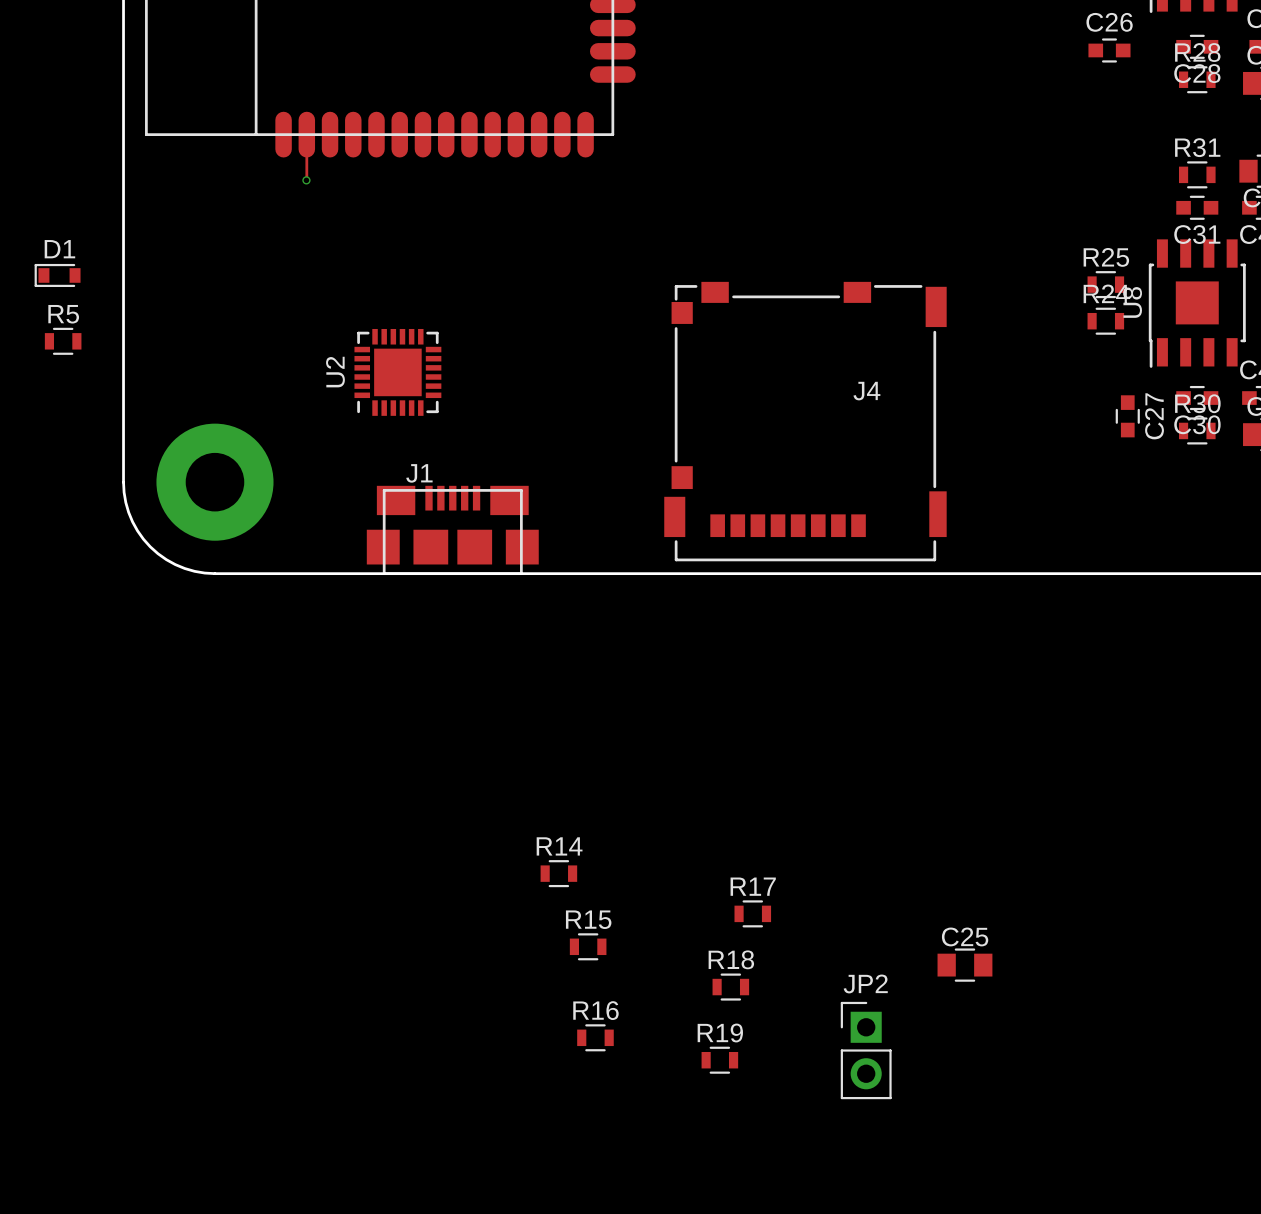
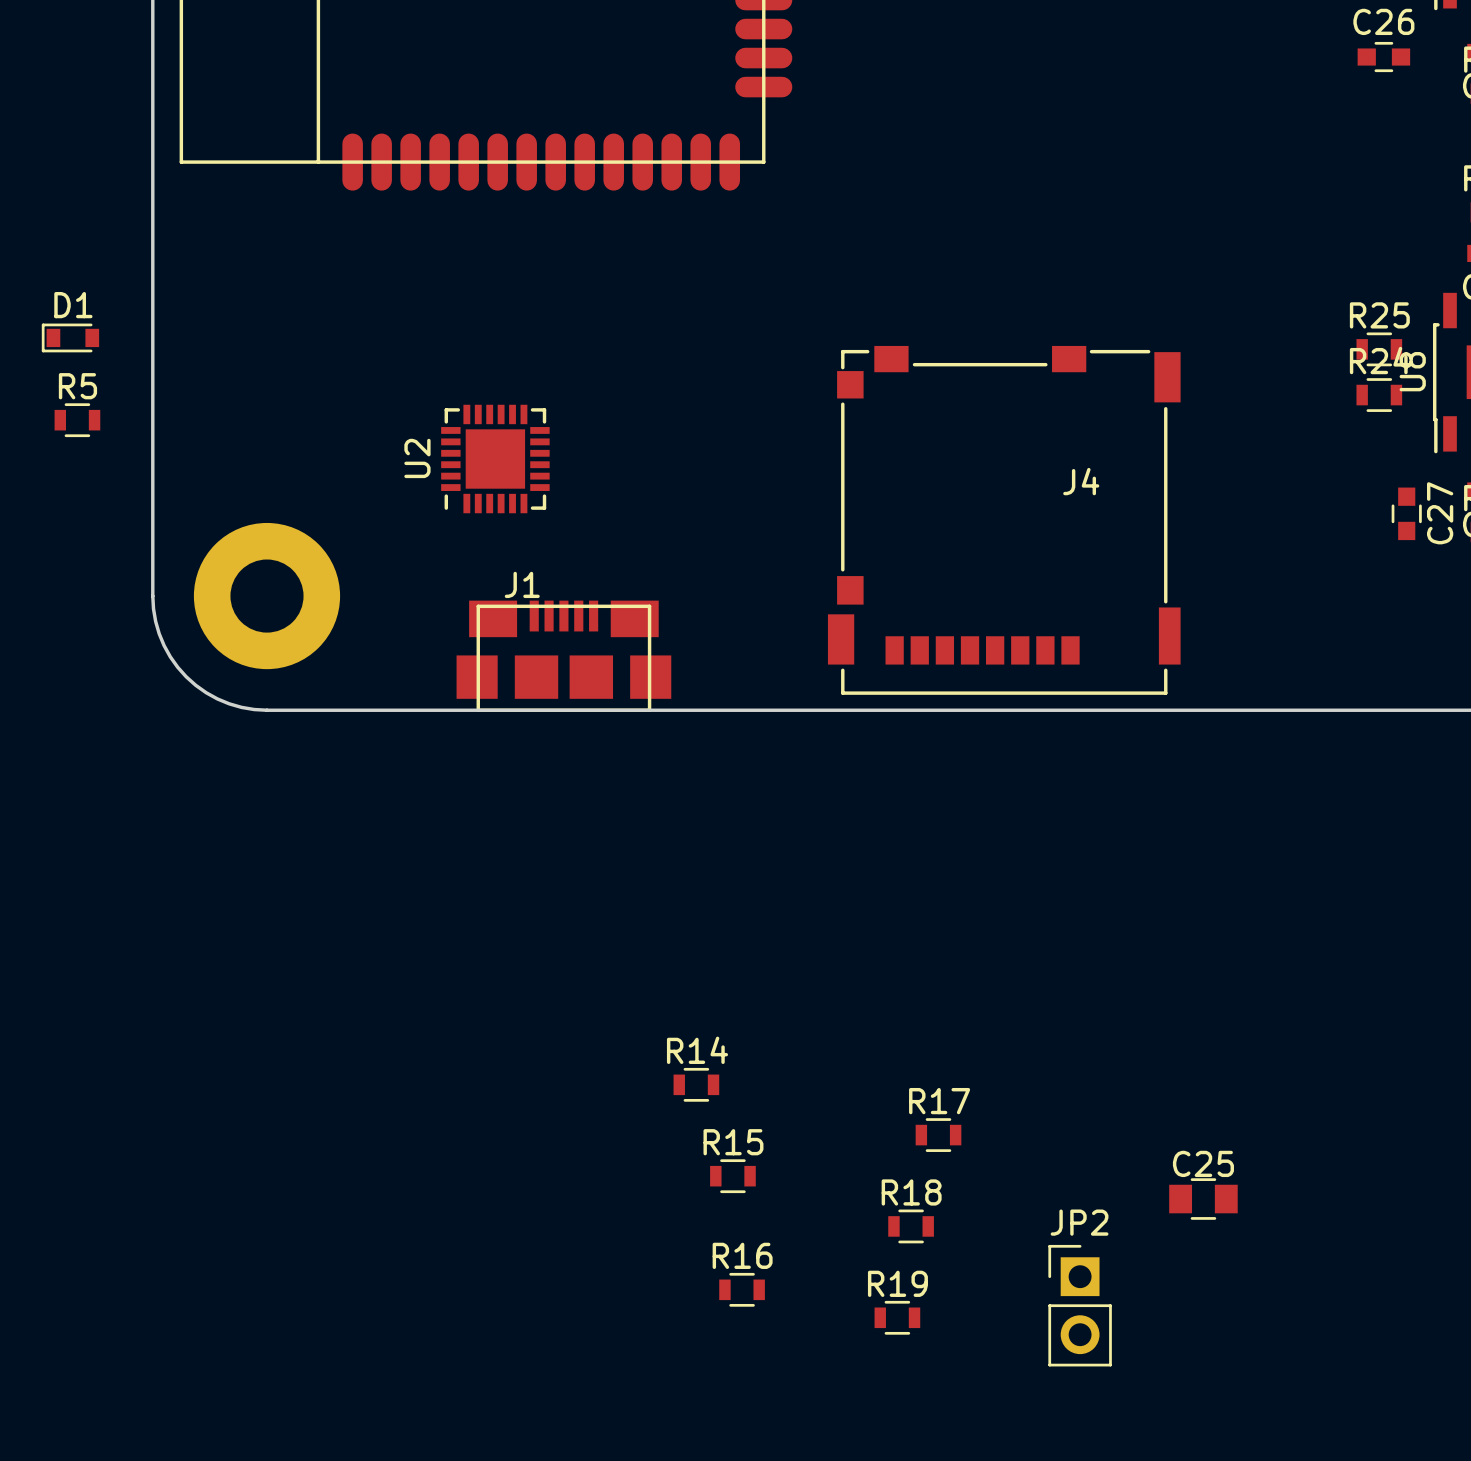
track: (306, 134) (306, 180) -> none
via: (306, 180) -> none

